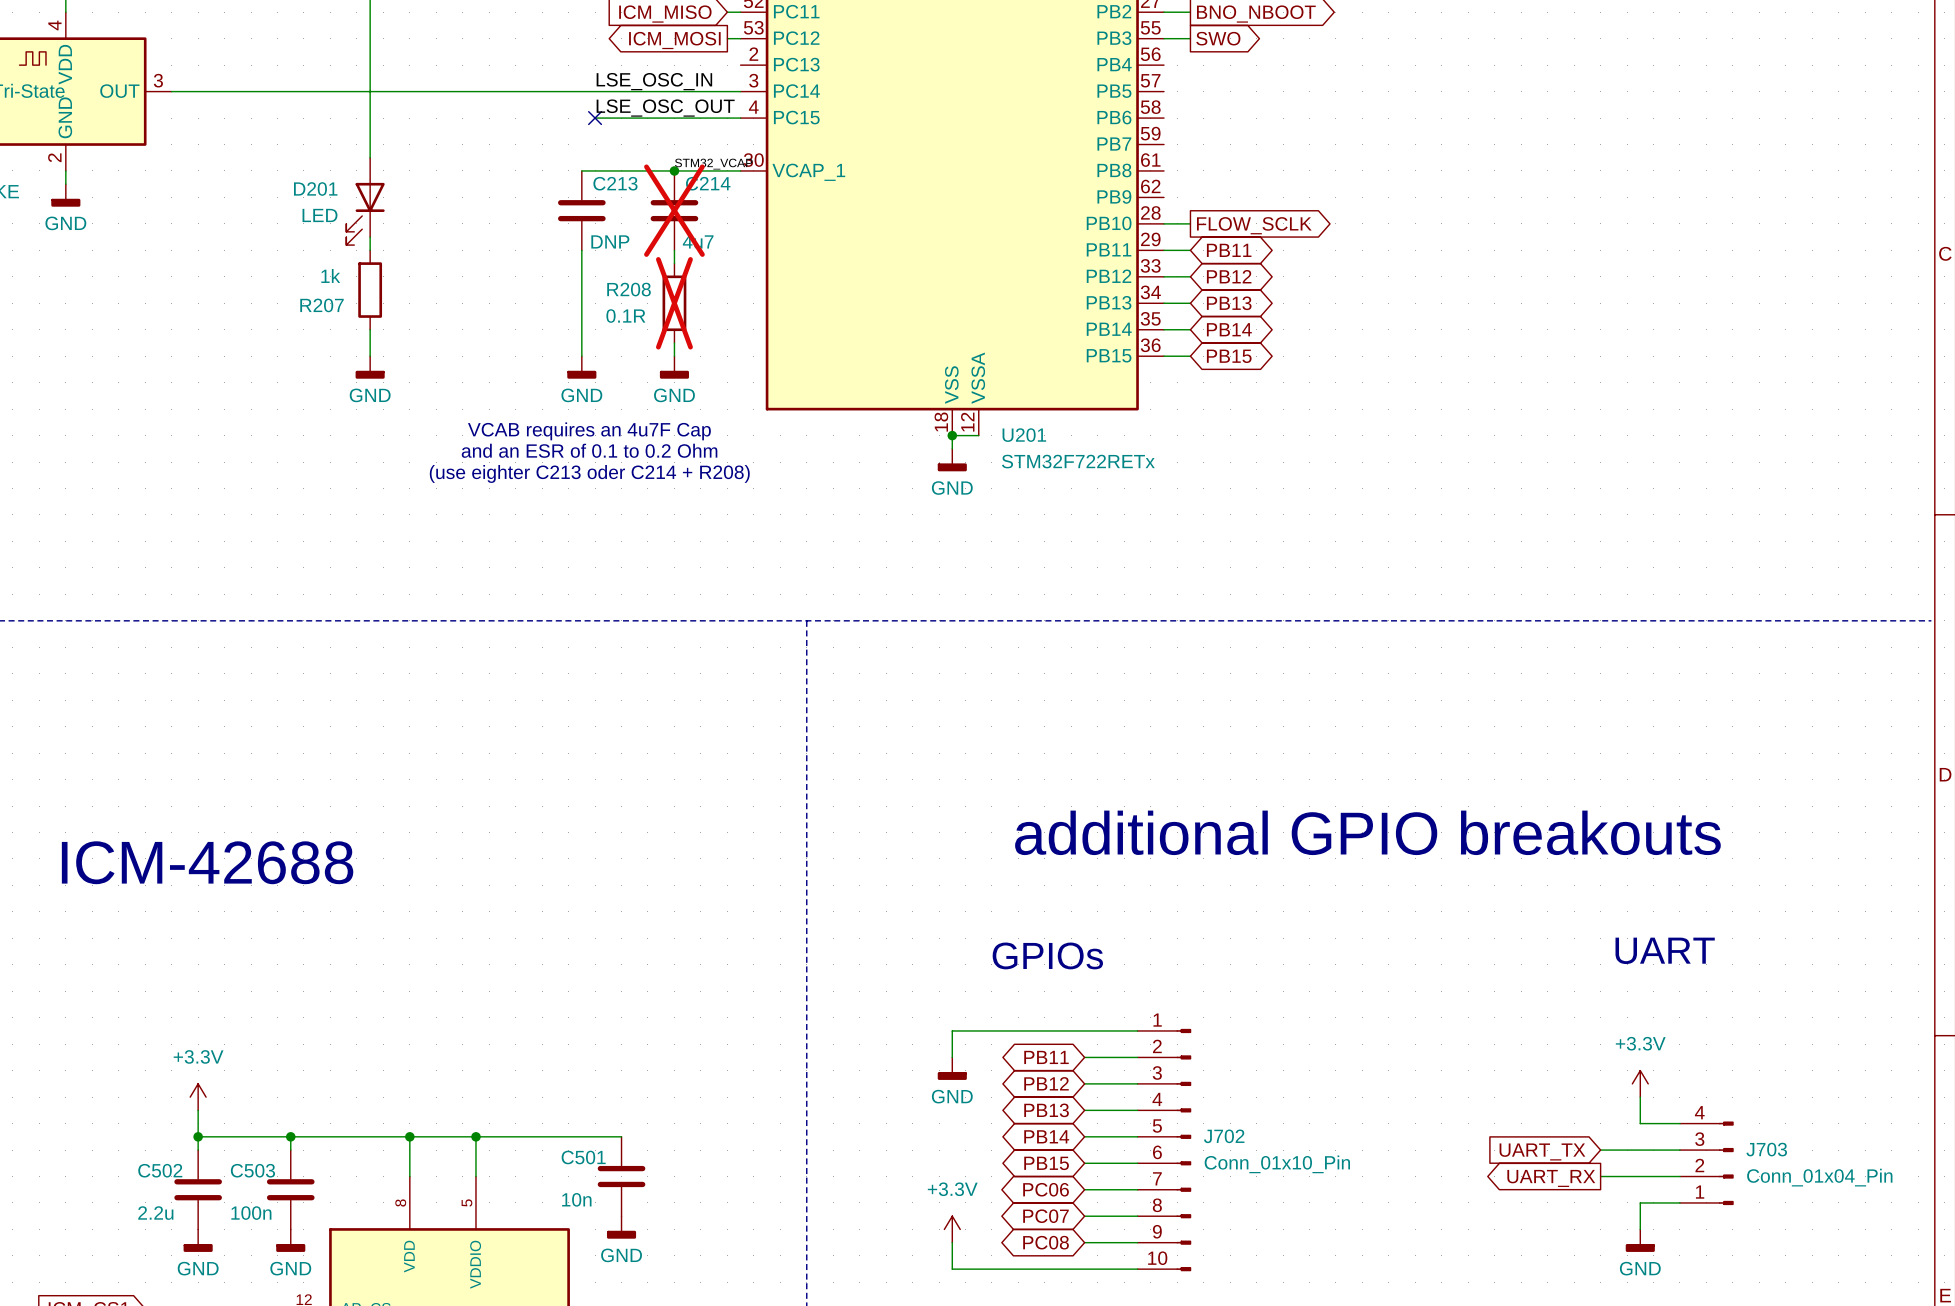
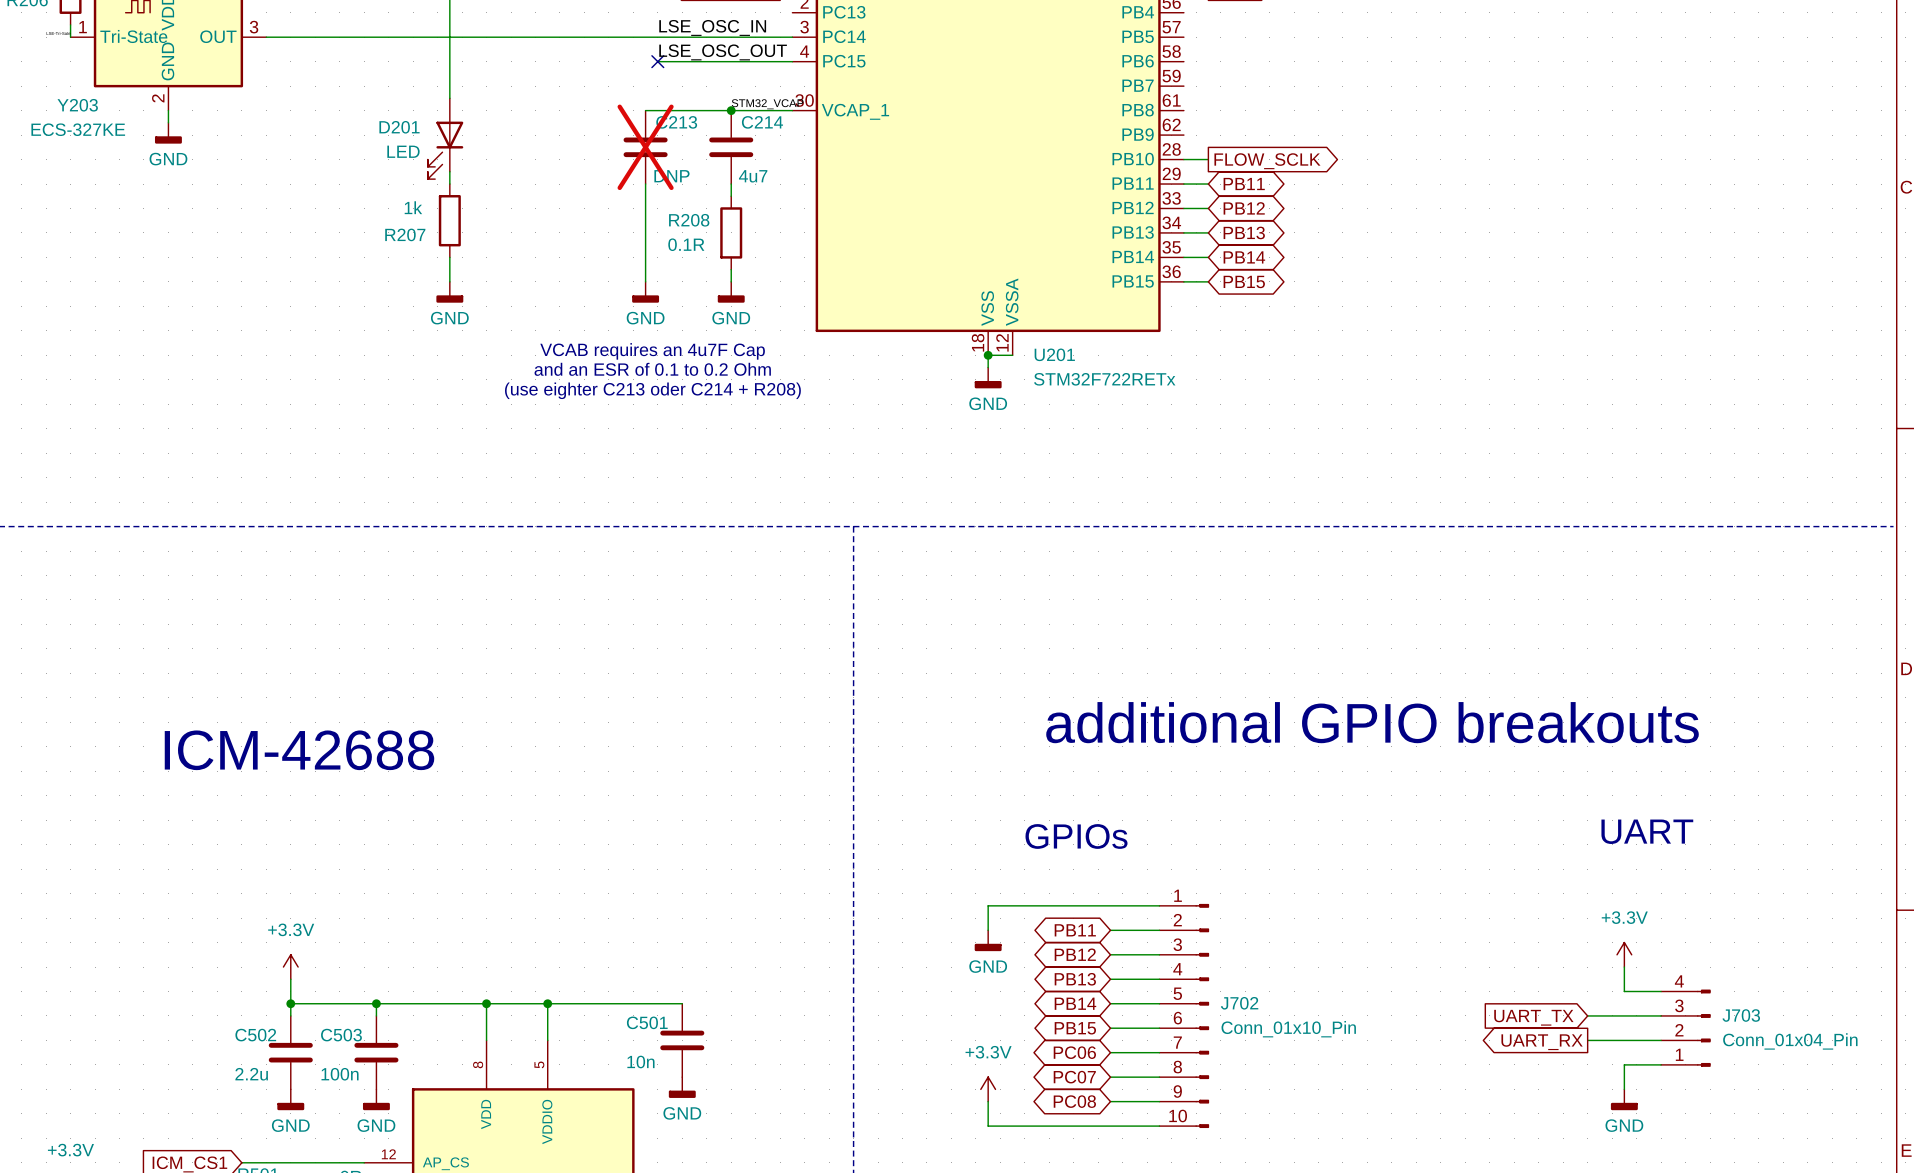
C213 do-not-place cross: none -> (645, 147)
C214 do-not-place cross: (674, 210) -> none
R208 do-not-place cross: (674, 303) -> none

